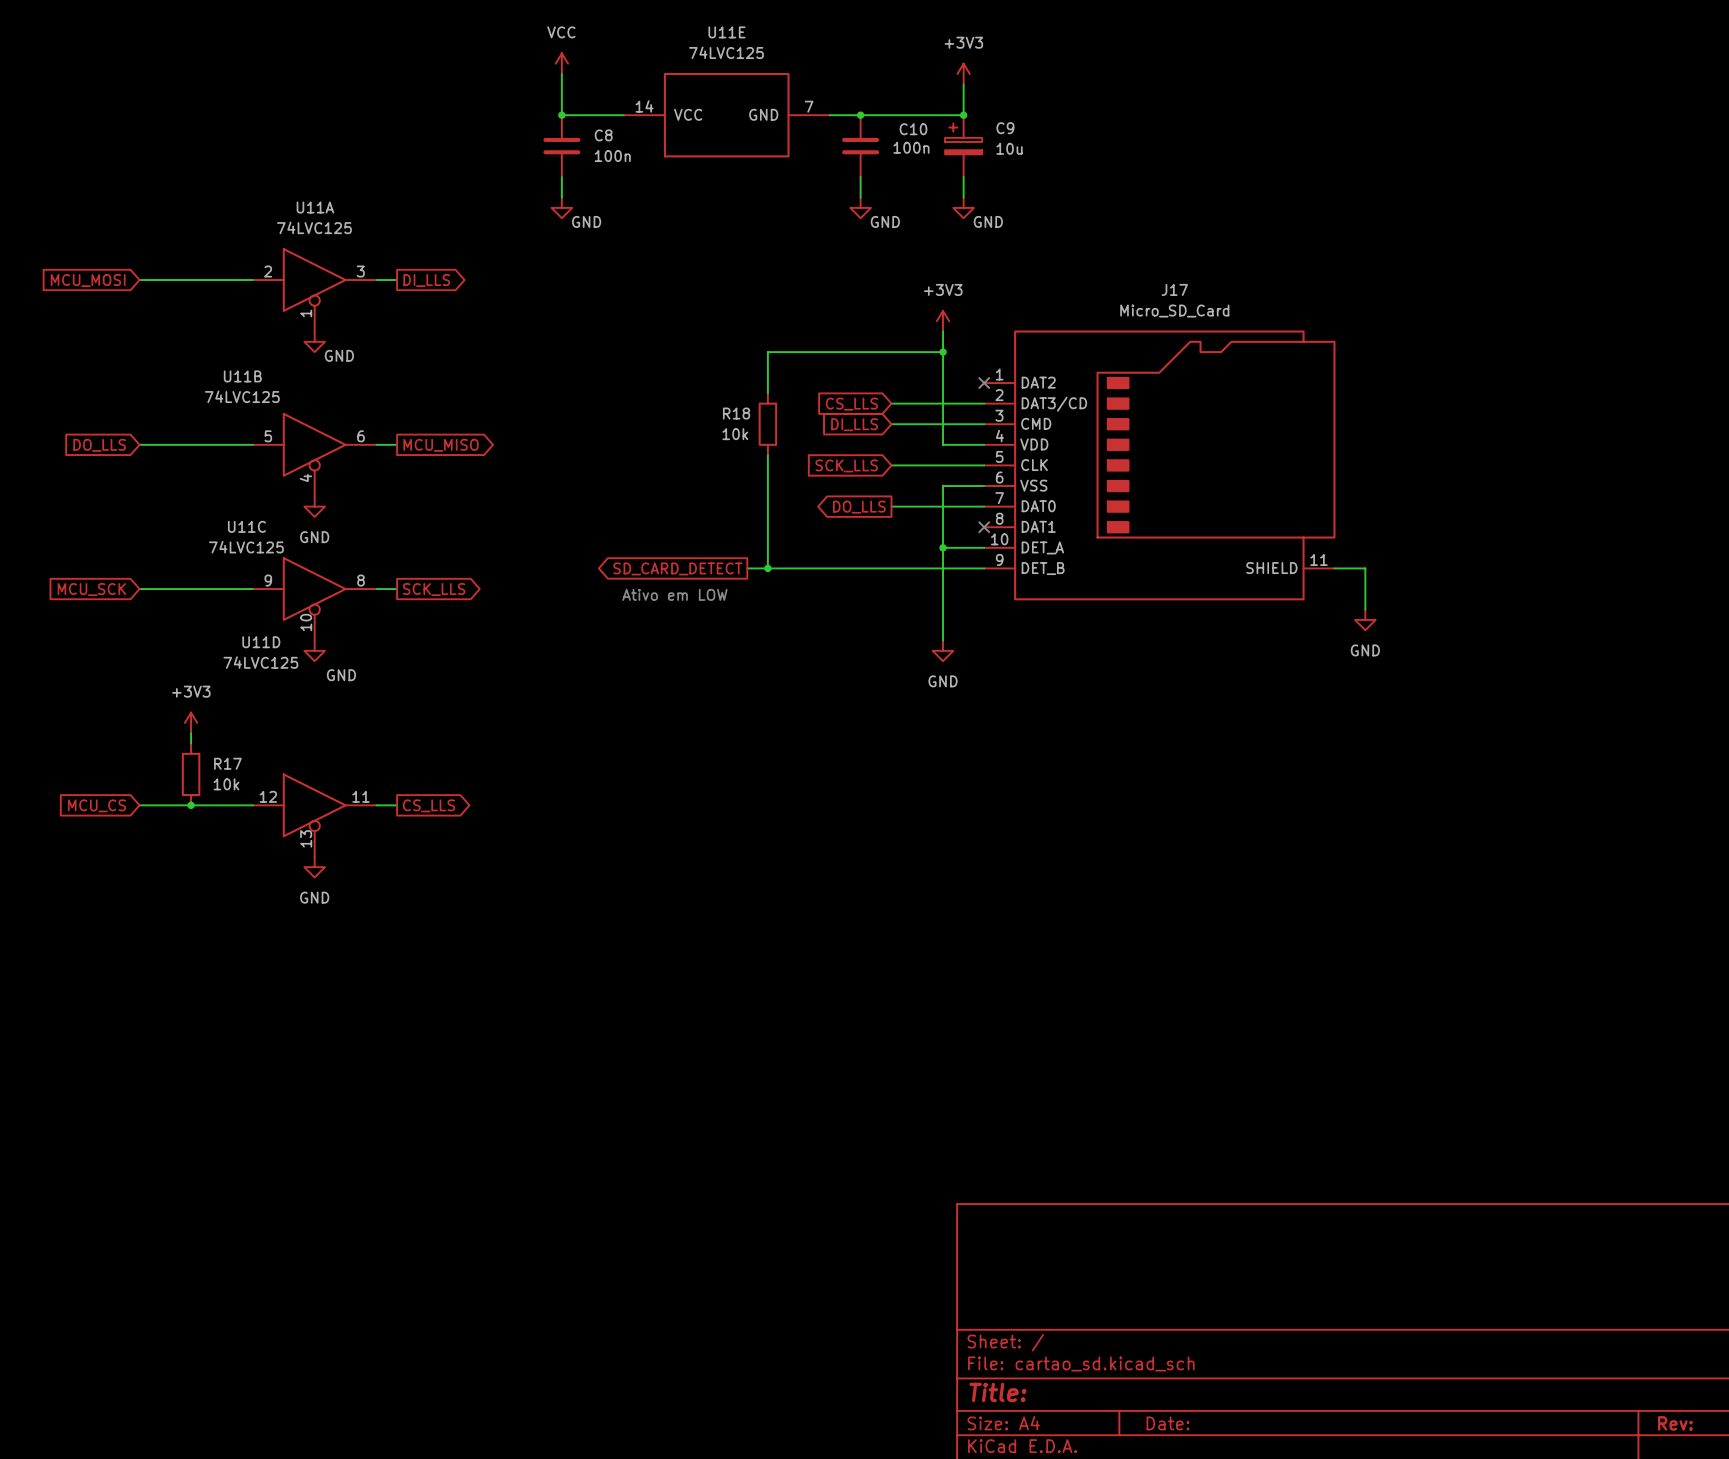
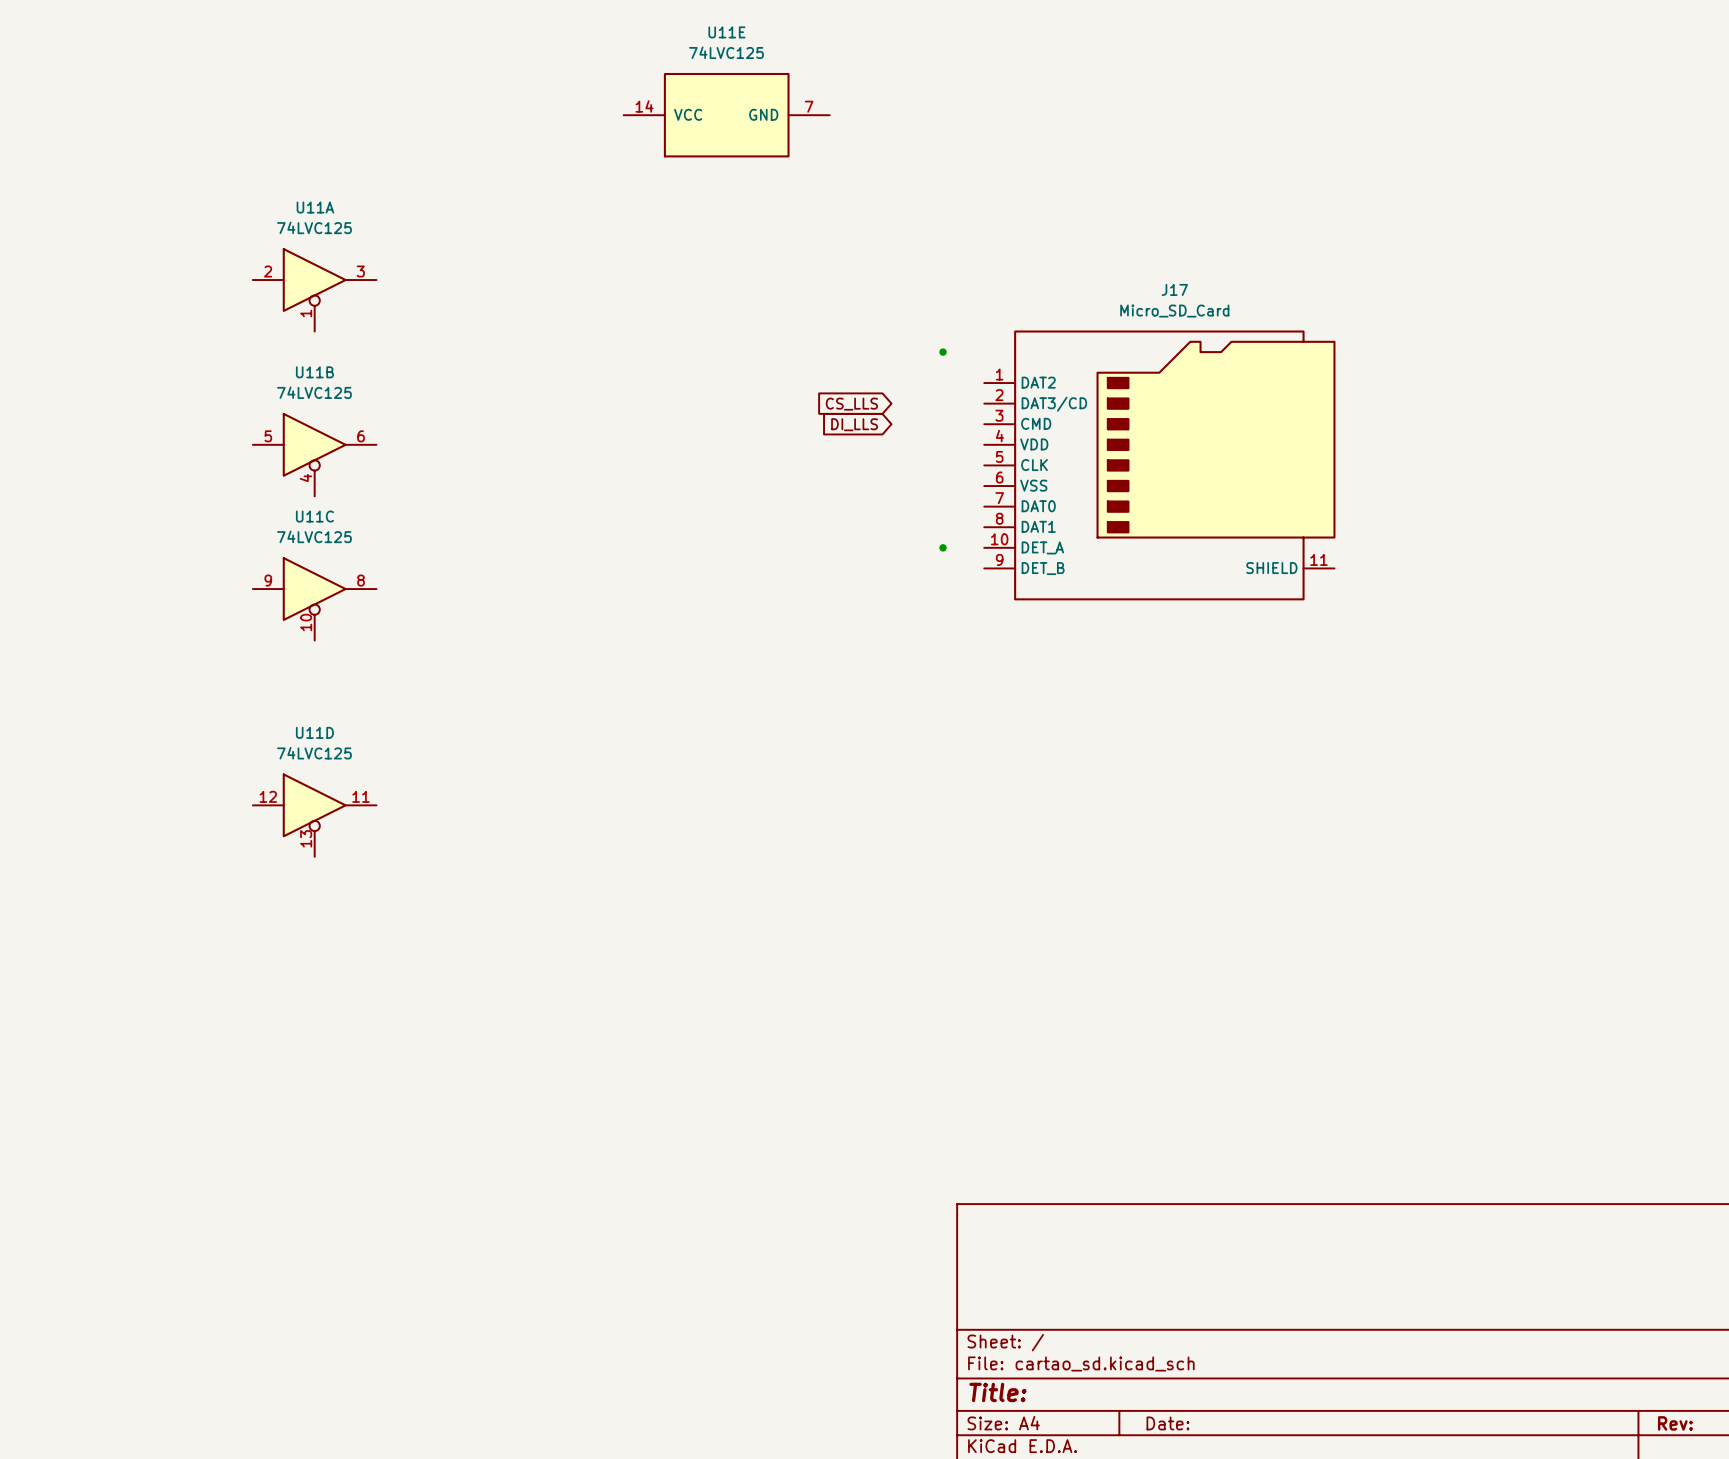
power symbol: VCC (561, 63) -> none
wire: (561, 73) (561, 115) (623, 115) -> none
power symbol: +3V3 (963, 73) -> none
wire: (963, 84) (963, 115) (829, 115) -> none
junction: (561, 115) -> none
junction: (860, 115) -> none
junction: (963, 115) -> none
C8: 100n (561, 146) -> none
C10: 100n (860, 146) -> none
C9: 10u (963, 146) -> none
wire: (561, 177) (561, 197) -> none
wire: (860, 177) (860, 197) -> none
wire: (963, 177) (963, 197) -> none
power symbol: GND (561, 207) -> none
power symbol: GND (860, 207) -> none
power symbol: GND (963, 207) -> none
global label: MCU_MOSI (88, 280) -> none
wire: (139, 280) (252, 280) -> none
wire: (376, 280) (397, 280) -> none
global label: DI_LLS (426, 280) -> none
power symbol: +3V3 (943, 321) -> none
wire: (943, 331) (943, 444) (984, 444) -> none
power symbol: GND (314, 341) -> none
wire: (943, 352) (767, 352) (767, 393) -> none
U11B name position: U11B (242, 376) -> U11B (314, 372)
no-connect mark: (984, 383) -> none
U11B value position: 74LVC125 (242, 396) -> 74LVC125 (314, 392)
wire: (891, 403) (984, 403) -> none
R18: 10k (767, 424) -> none
wire: (891, 424) (984, 424) -> none
wire: (139, 444) (252, 444) -> none
wire: (376, 444) (397, 444) -> none
global label: DO_LLS (99, 445) -> none
global label: MCU_MISO (441, 445) -> none
wire: (767, 455) (767, 568) -> none
global label: SCK_LLS (846, 465) -> none
wire: (891, 465) (984, 465) -> none
wire: (984, 486) (943, 486) (943, 640) -> none
power symbol: GND (314, 506) -> none
wire: (891, 506) (984, 506) -> none
global label: DO_LLS (859, 507) -> none
U11C name position: U11C (246, 526) -> U11C (314, 516)
no-connect mark: (984, 527) -> none
U11C value position: 74LVC125 (246, 547) -> 74LVC125 (314, 536)
wire: (943, 547) (984, 547) -> none
global label: SD_CARD_DETECT (677, 568) -> none
wire: (747, 568) (984, 568) -> none
junction: (767, 568) -> none
wire: (1334, 568) (1365, 568) (1365, 609) -> none
global label: MCU_SCK (91, 589) -> none
wire: (139, 589) (252, 589) -> none
wire: (376, 589) (397, 589) -> none
global label: SCK_LLS (434, 589) -> none
text: Ativo em LOW (674, 594) -> none
power symbol: GND (1365, 619) -> none
U11D name position: U11D (261, 642) -> U11D (314, 732)
power symbol: GND (314, 650) -> none
power symbol: GND (943, 650) -> none
U11D value position: 74LVC125 (260, 662) -> 74LVC125 (314, 753)
power symbol: +3V3 (191, 722) -> none
wire: (191, 733) (191, 743) -> none
R17: 10k (191, 774) -> none
global label: MCU_CS (96, 805) -> none
wire: (139, 805) (252, 805) -> none
junction: (191, 805) -> none
wire: (376, 805) (397, 805) -> none
global label: CS_LLS (428, 805) -> none
power symbol: GND (314, 867) -> none

